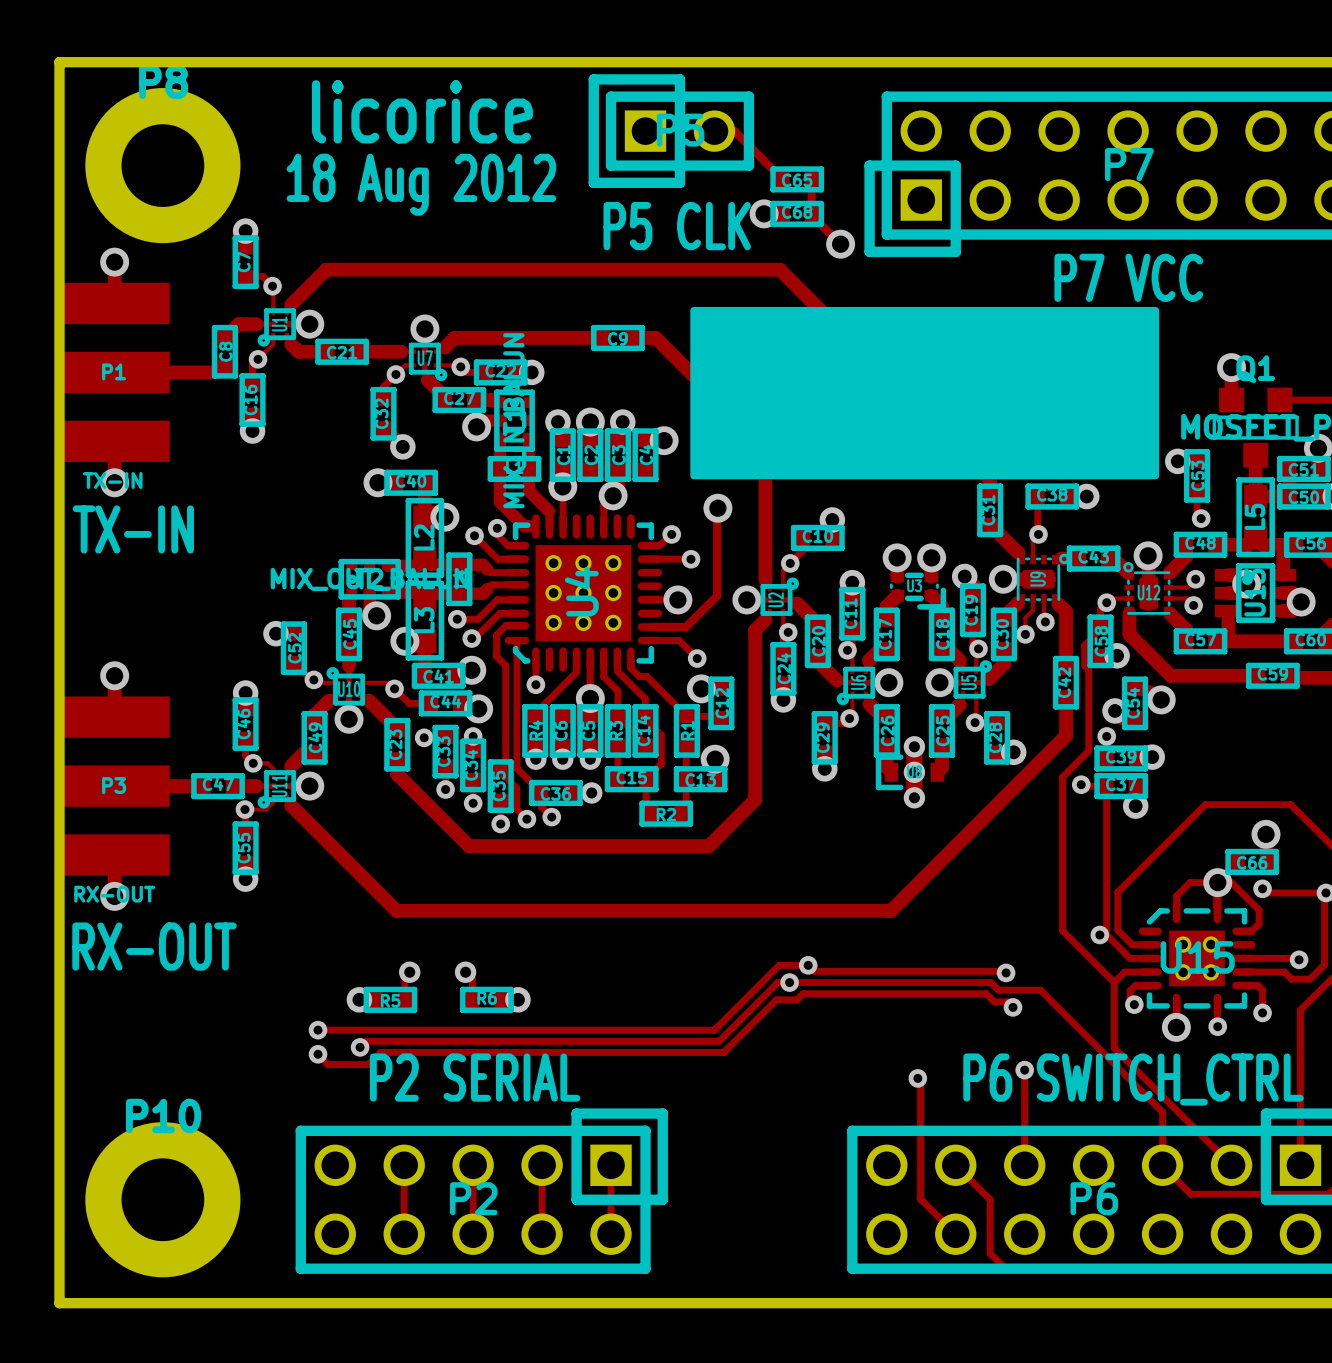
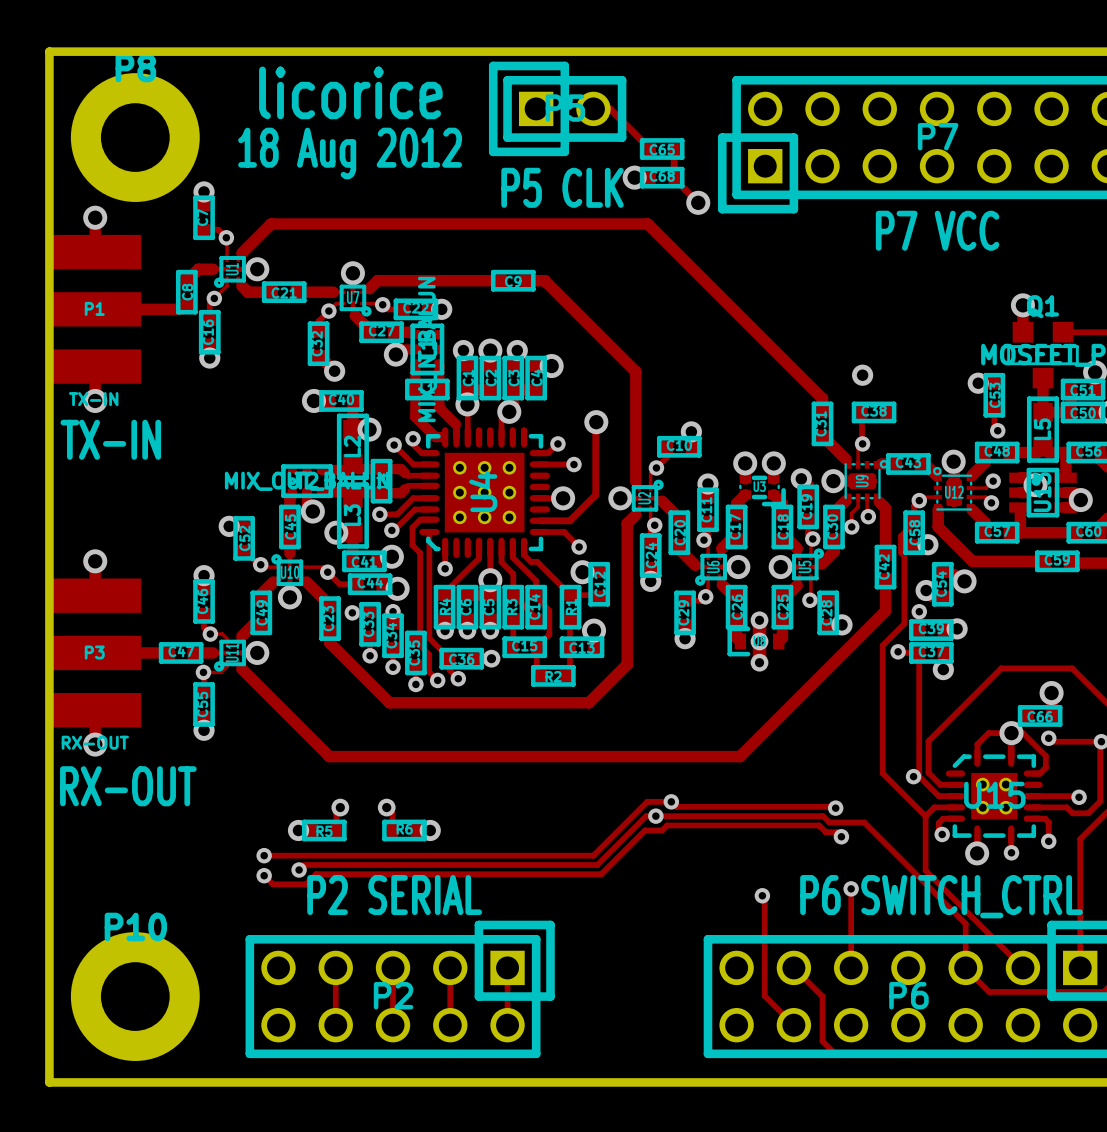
drawing: [690, 306, 1160, 480] -> none
via position: (1086, 496) -> (862, 375)

